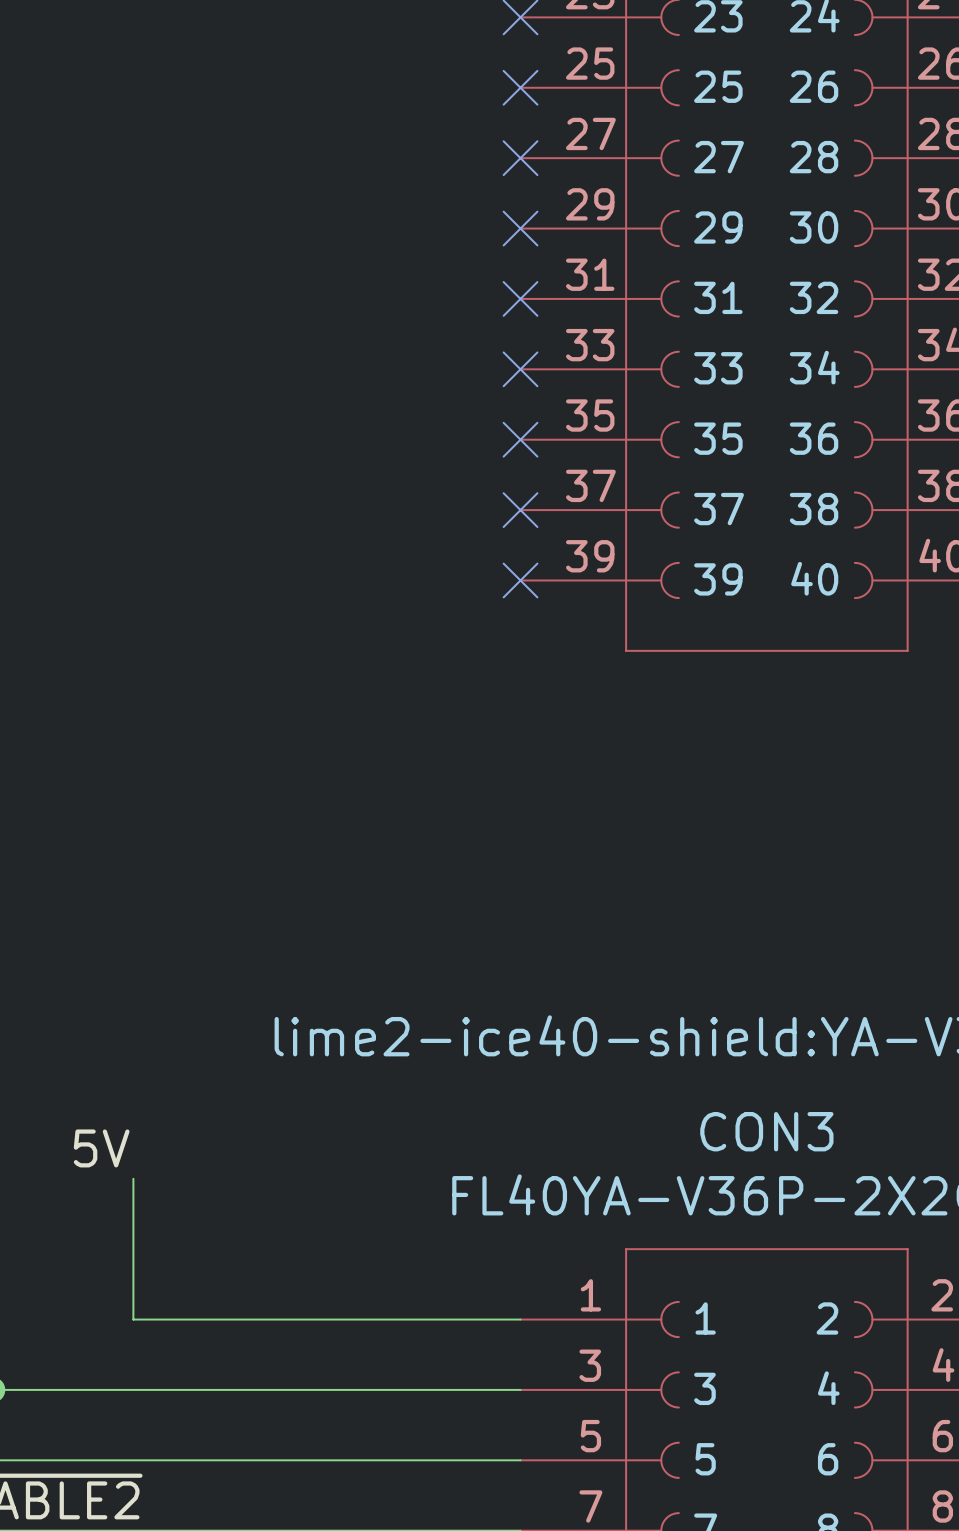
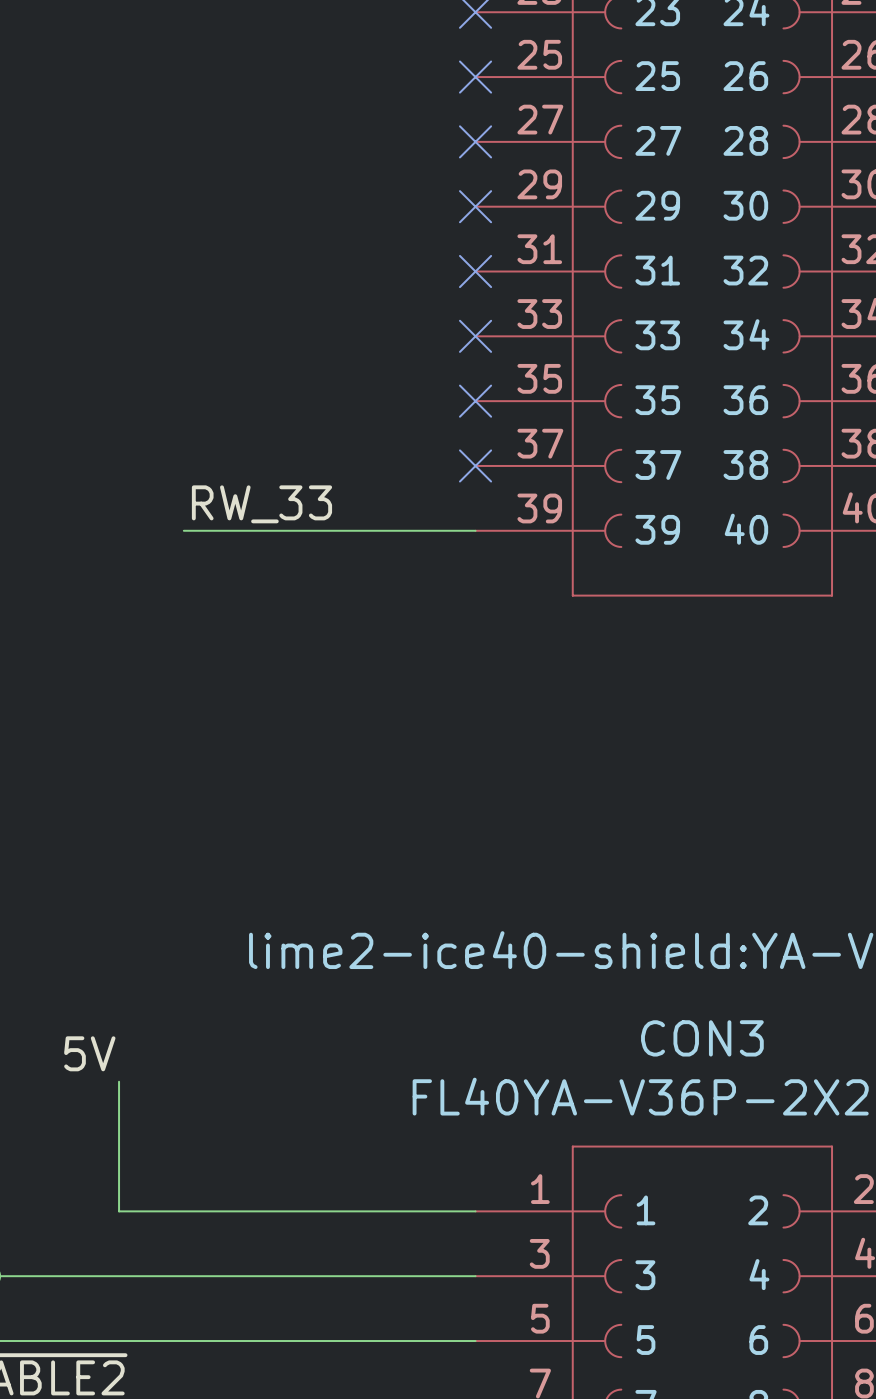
label: none -> RW_33 (261, 504)
wire: none -> (183, 530) (475, 530)
no-connect mark: (520, 580) -> none

